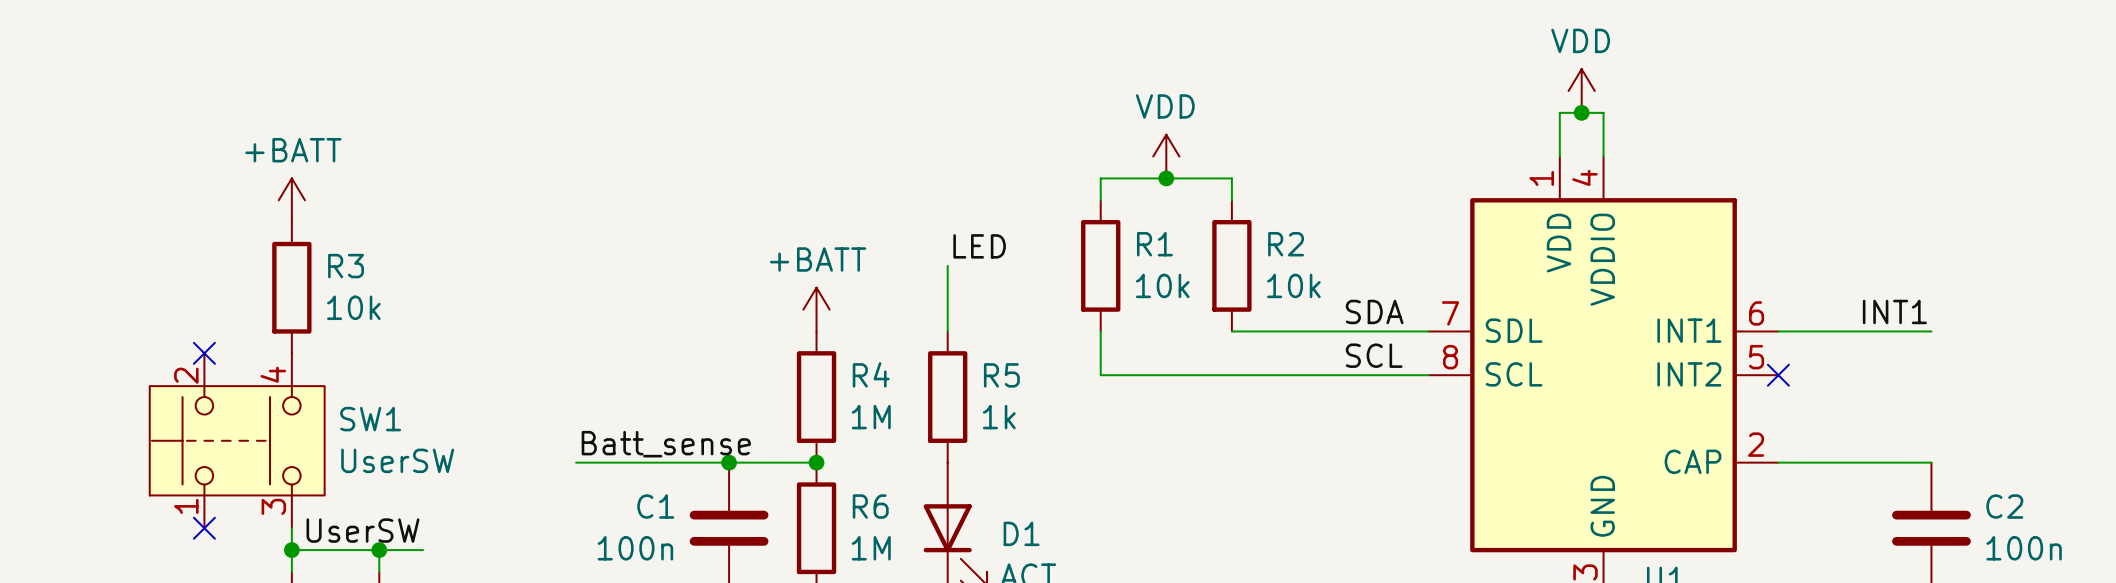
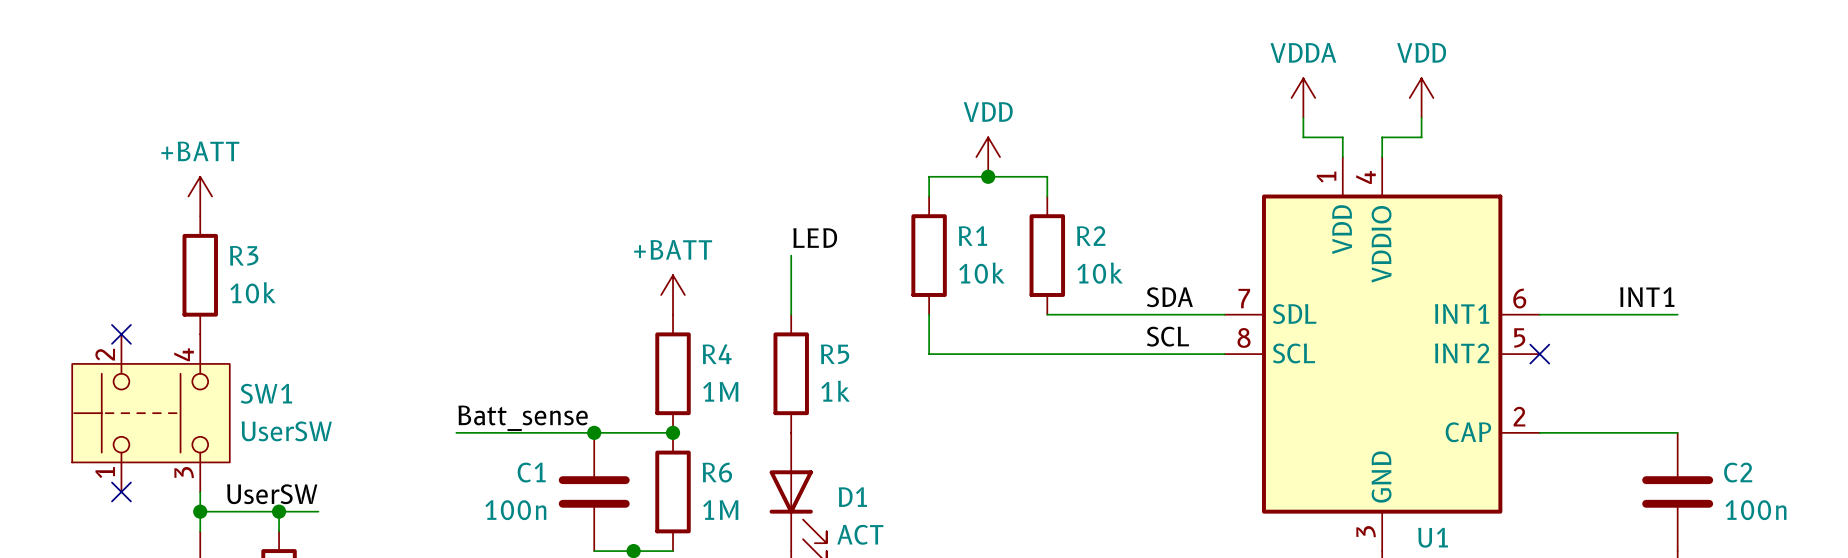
power symbol: none -> VDDA (1303, 97)
power symbol position: VDD (1581, 91) -> VDD (1421, 97)
wire: none -> (1303, 117) (1303, 137) (1342, 137)
junction: (1581, 112) -> none
wire: (1559, 134) (1559, 112) (1603, 112) (1603, 134) -> (1421, 117) (1421, 137) (1382, 137)

